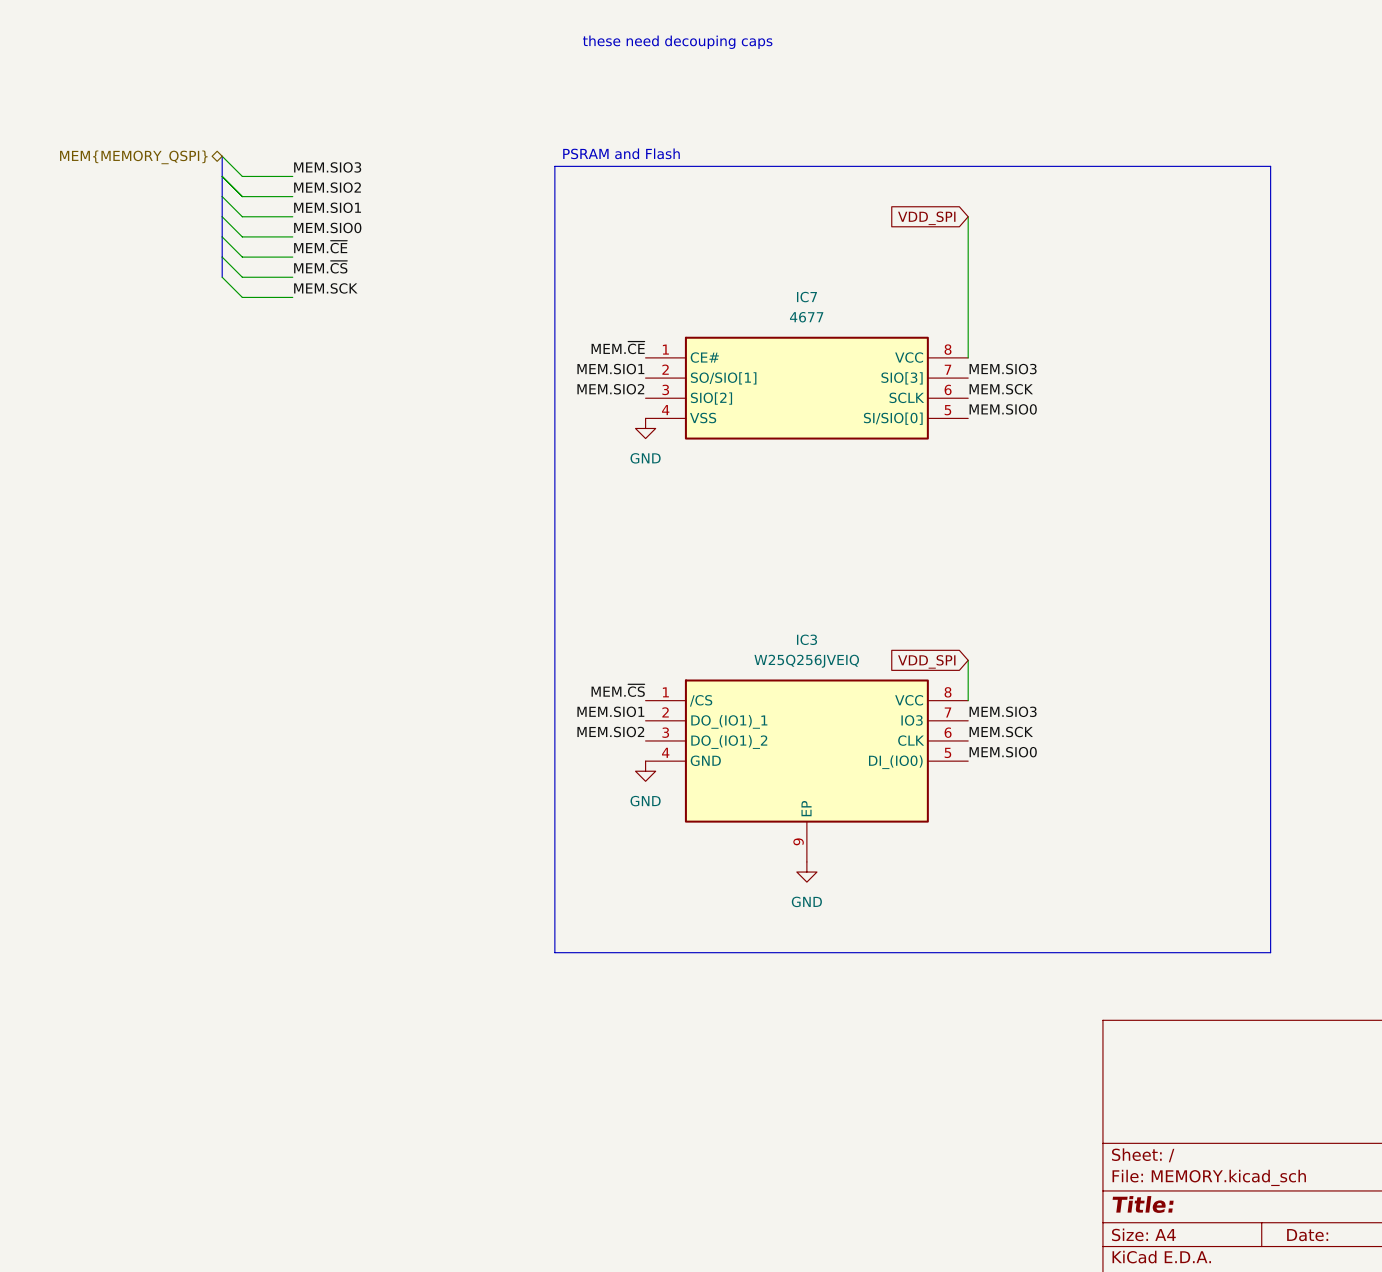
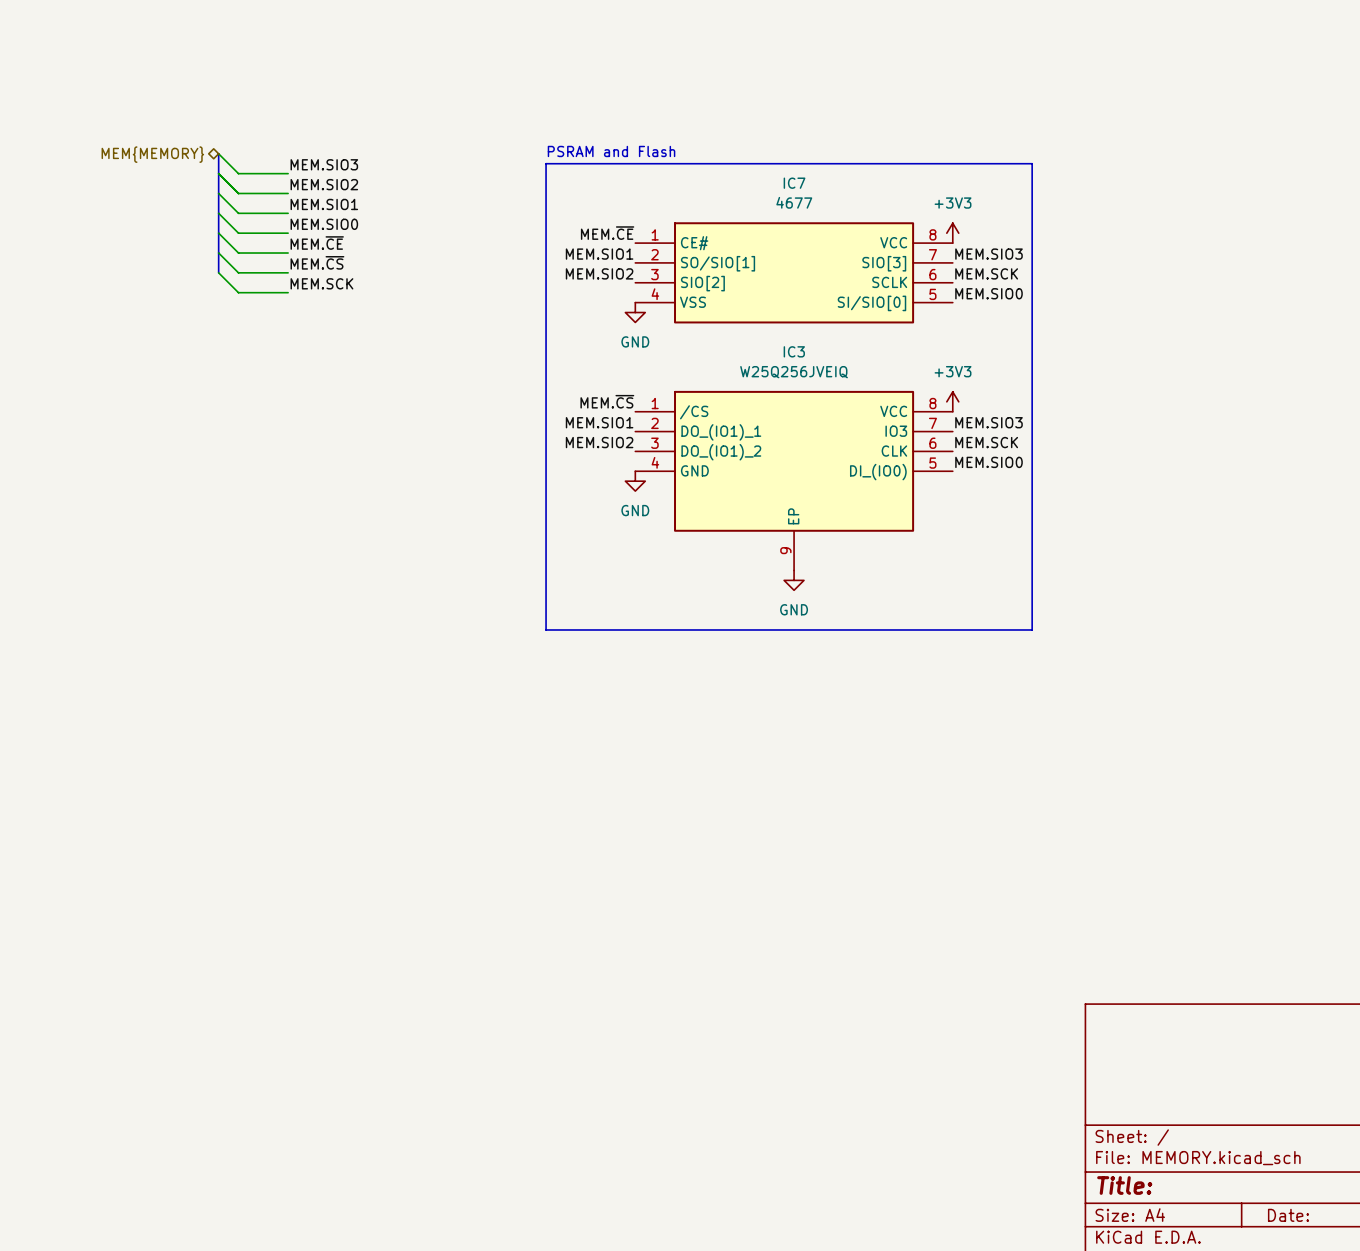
text: these need decouping caps (677, 42) -> none
hierarchical label: MEM{MEMORY_QSPI} (133, 157) -> MEM{MEMORY} (152, 154)
line: (1048, 166) (1270, 166) (1270, 952) (554, 952) (554, 640) -> (1032, 163) (1032, 629) (546, 629)
wire: (968, 216) (968, 357) -> none
global label: VDD_SPI (926, 218) -> none
power symbol: none -> +3V3 (952, 233)
label: none -> MEM.SIO1 (599, 254)
label: none -> MEM.SIO3 (989, 254)
label: none -> MEM.SIO2 (599, 273)
label: none -> MEM.SCK (986, 273)
label: none -> MEM.SIO0 (989, 293)
power symbol: none -> GND (635, 312)
label position: MEM.~{CE} (618, 347) -> MEM.~{CE} (607, 233)
label: MEM.SIO1 (610, 369) -> none
label: MEM.SIO3 (1003, 369) -> none
IC7 position: (806, 388) -> (794, 272)
label: MEM.SIO2 (610, 389) -> none
label: MEM.SCK (1001, 389) -> none
label: none -> MEM.~{CS} (607, 401)
power symbol: none -> +3V3 (952, 401)
label: MEM.SIO0 (1003, 409) -> MEM.SIO3 (989, 422)
power symbol: GND (645, 428) -> none
label: none -> MEM.SIO1 (599, 422)
label: none -> MEM.SIO2 (599, 442)
label: none -> MEM.SCK (986, 442)
label: none -> MEM.SIO0 (989, 462)
power symbol: none -> GND (635, 481)
power symbol: none -> GND (794, 580)
wire: (968, 660) (968, 700) -> none
global label: VDD_SPI (926, 661) -> none
label: MEM.~{CS} (618, 690) -> none
label: MEM.SIO1 (610, 711) -> none
label: MEM.SIO3 (1003, 711) -> none
label: MEM.SIO2 (610, 731) -> none
label: MEM.SCK (1001, 731) -> none
label: MEM.SIO0 (1003, 752) -> none
IC3 position: (806, 770) -> (794, 480)
power symbol: GND (645, 771) -> none
power symbol: GND (806, 872) -> none

